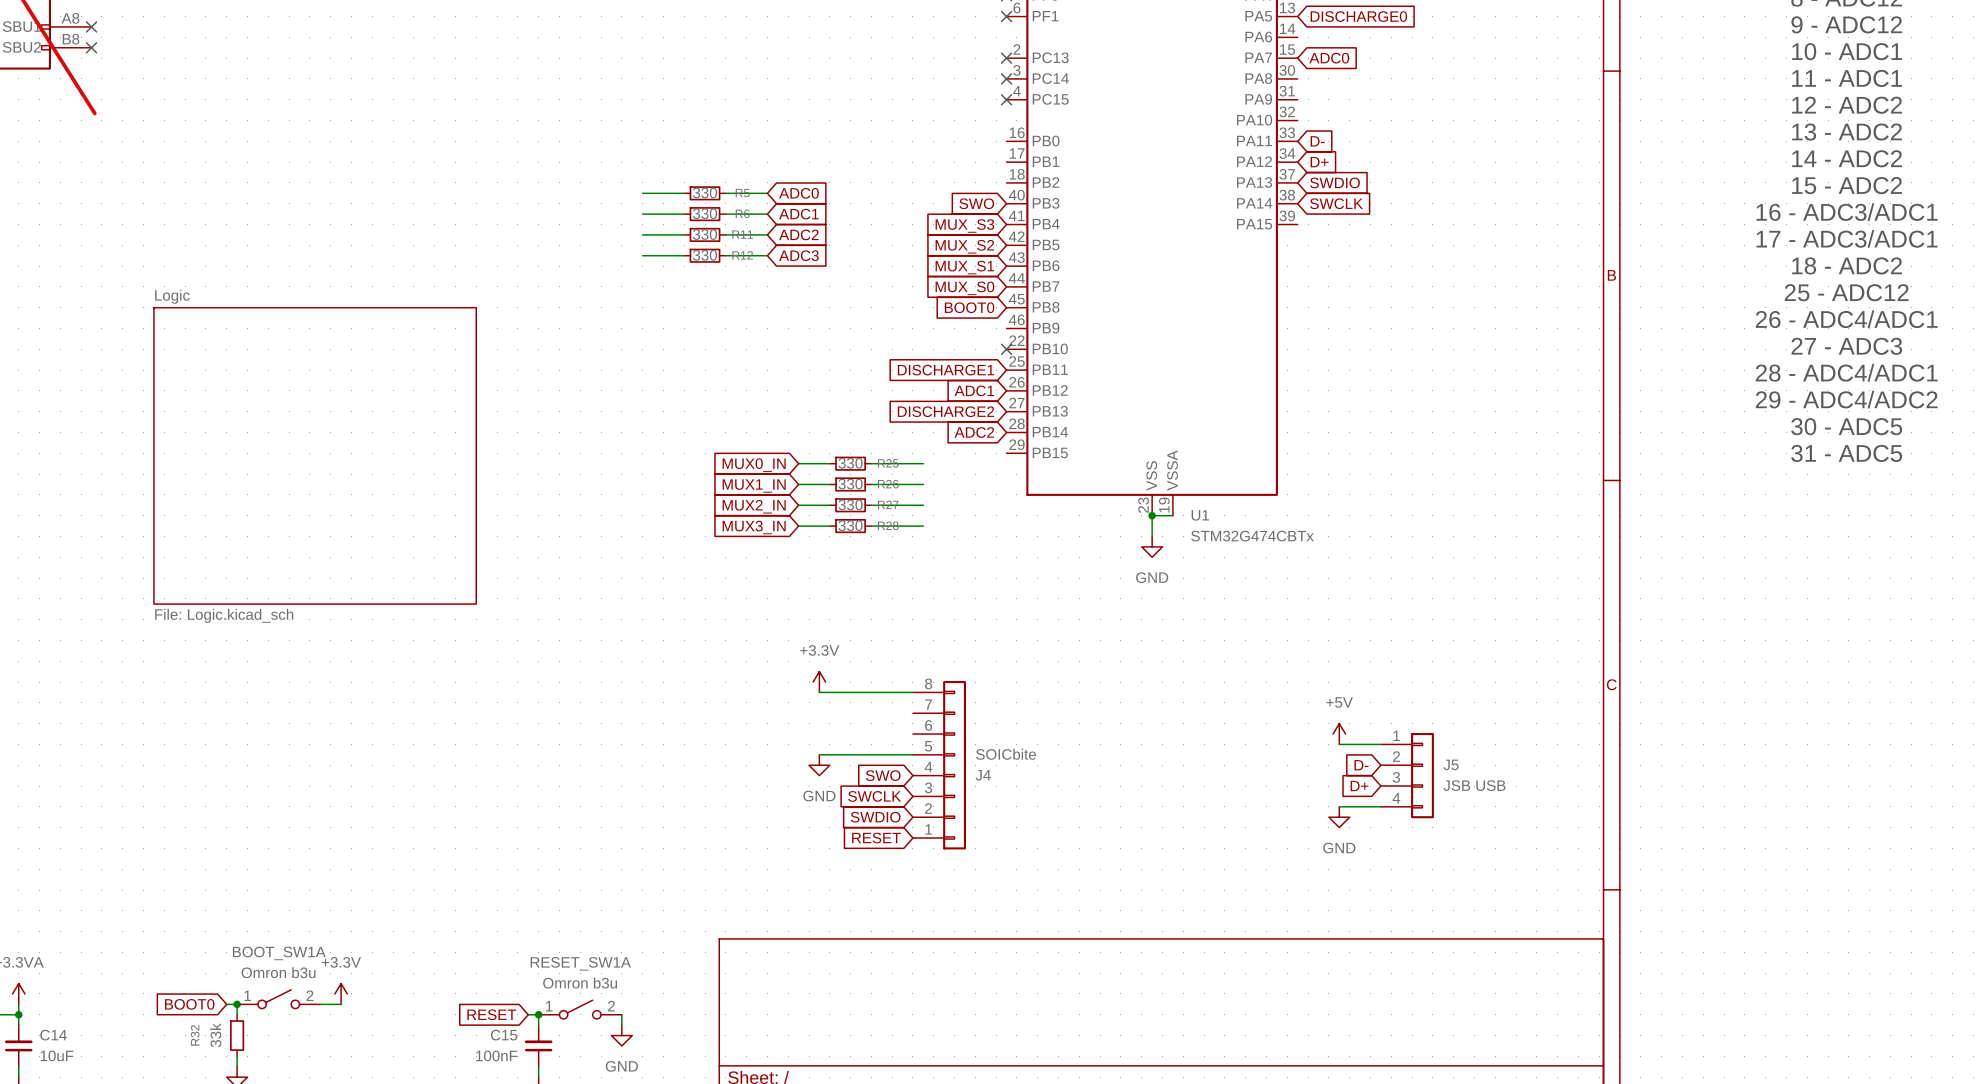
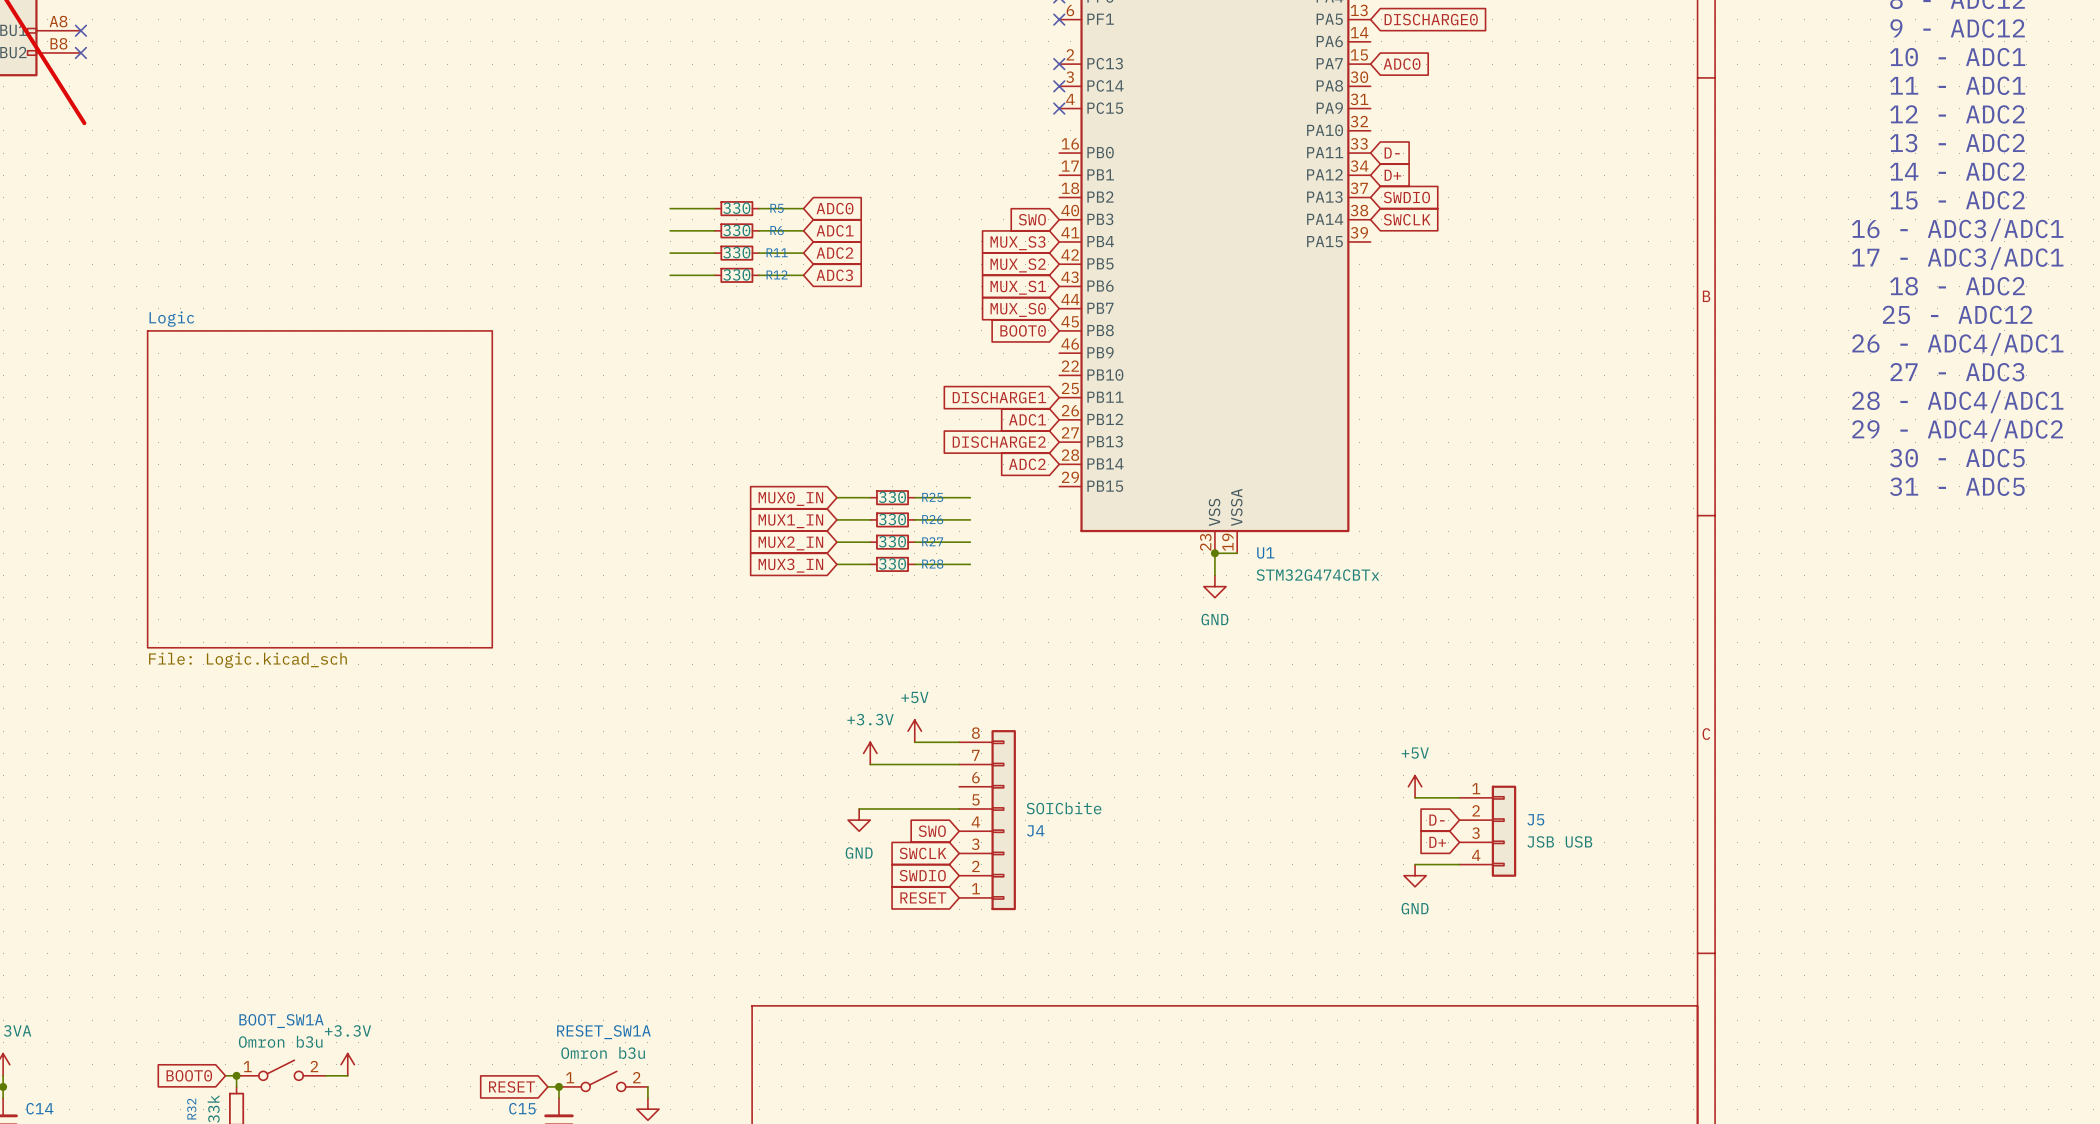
no-connect mark: (1006, 349) -> none
power symbol position: +3.3V (819, 682) -> +3.3V (870, 753)
power symbol: none -> +5V (914, 731)
wire: (819, 692) (871, 692) -> none
wire: none -> (870, 764) (959, 764)

